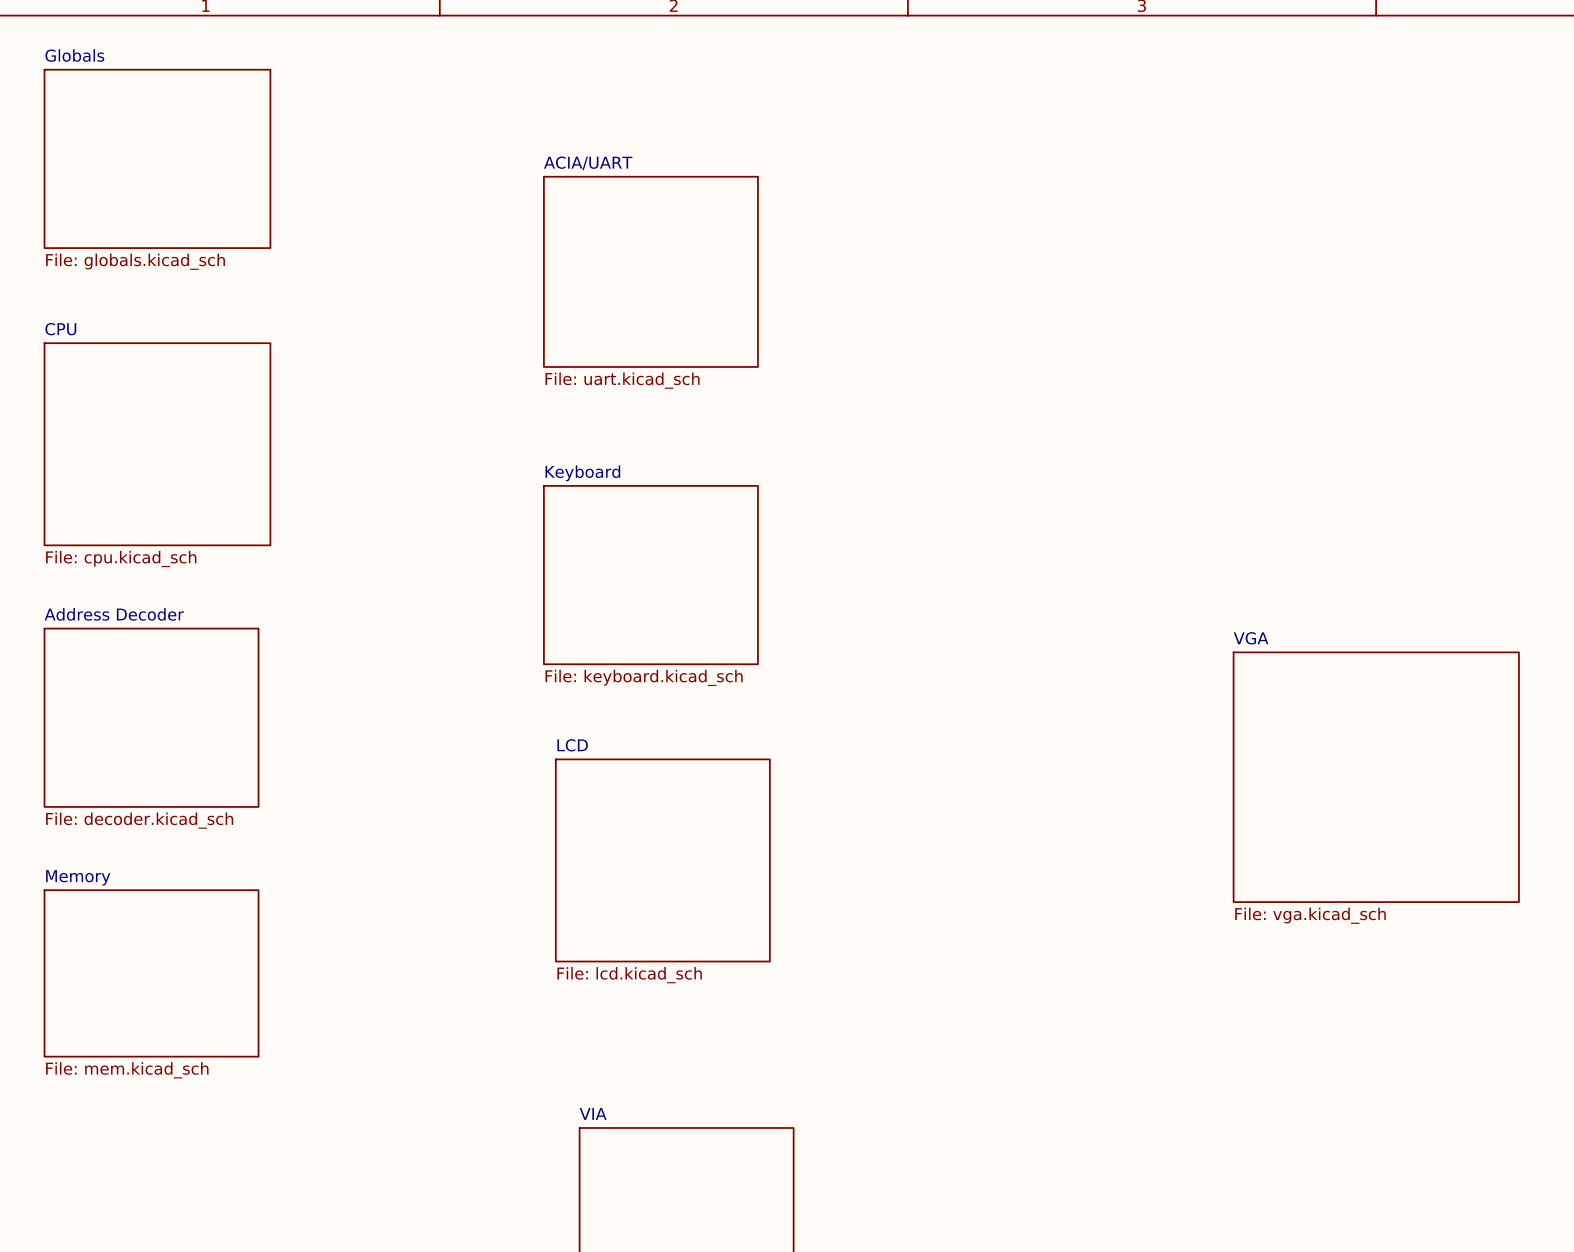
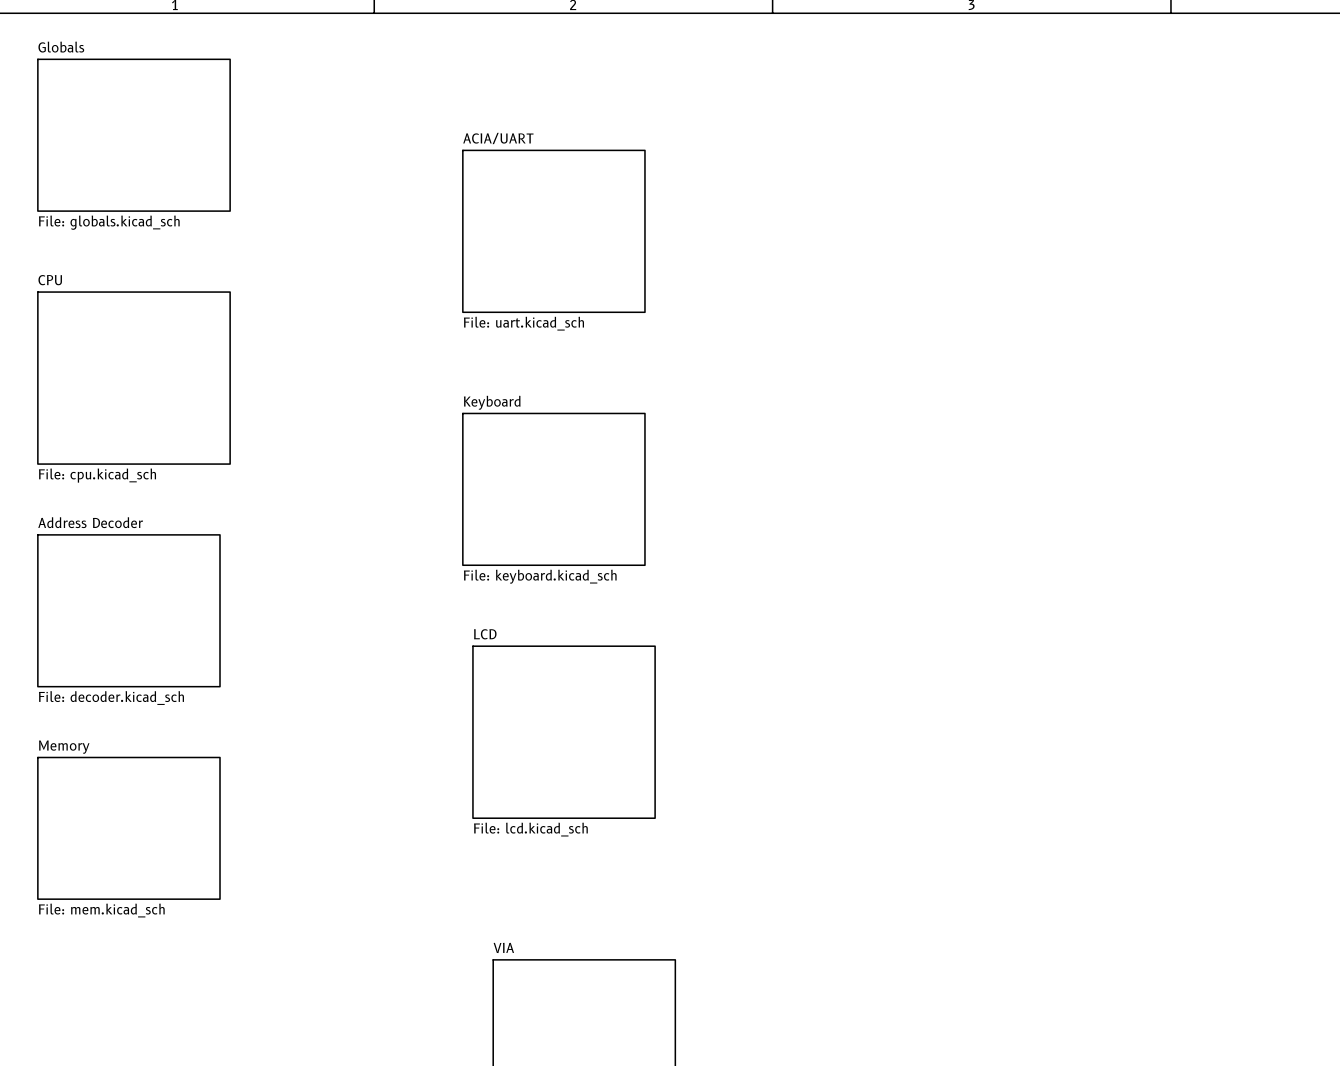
sheet VGA: File: vga.kicad_sch (1376, 777) -> none

